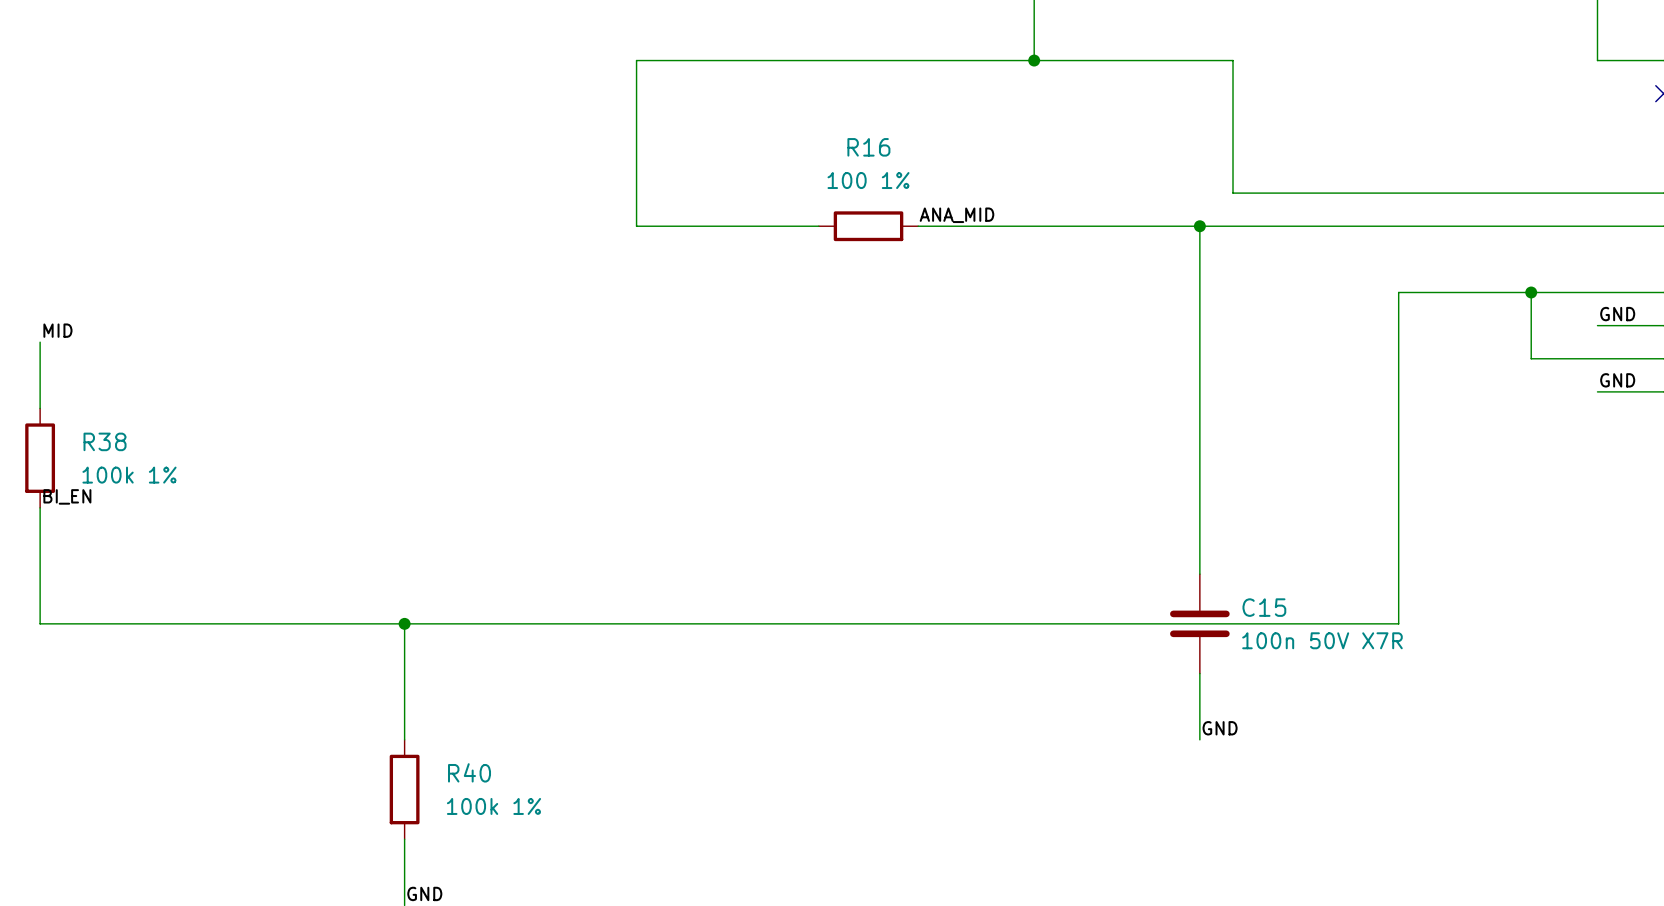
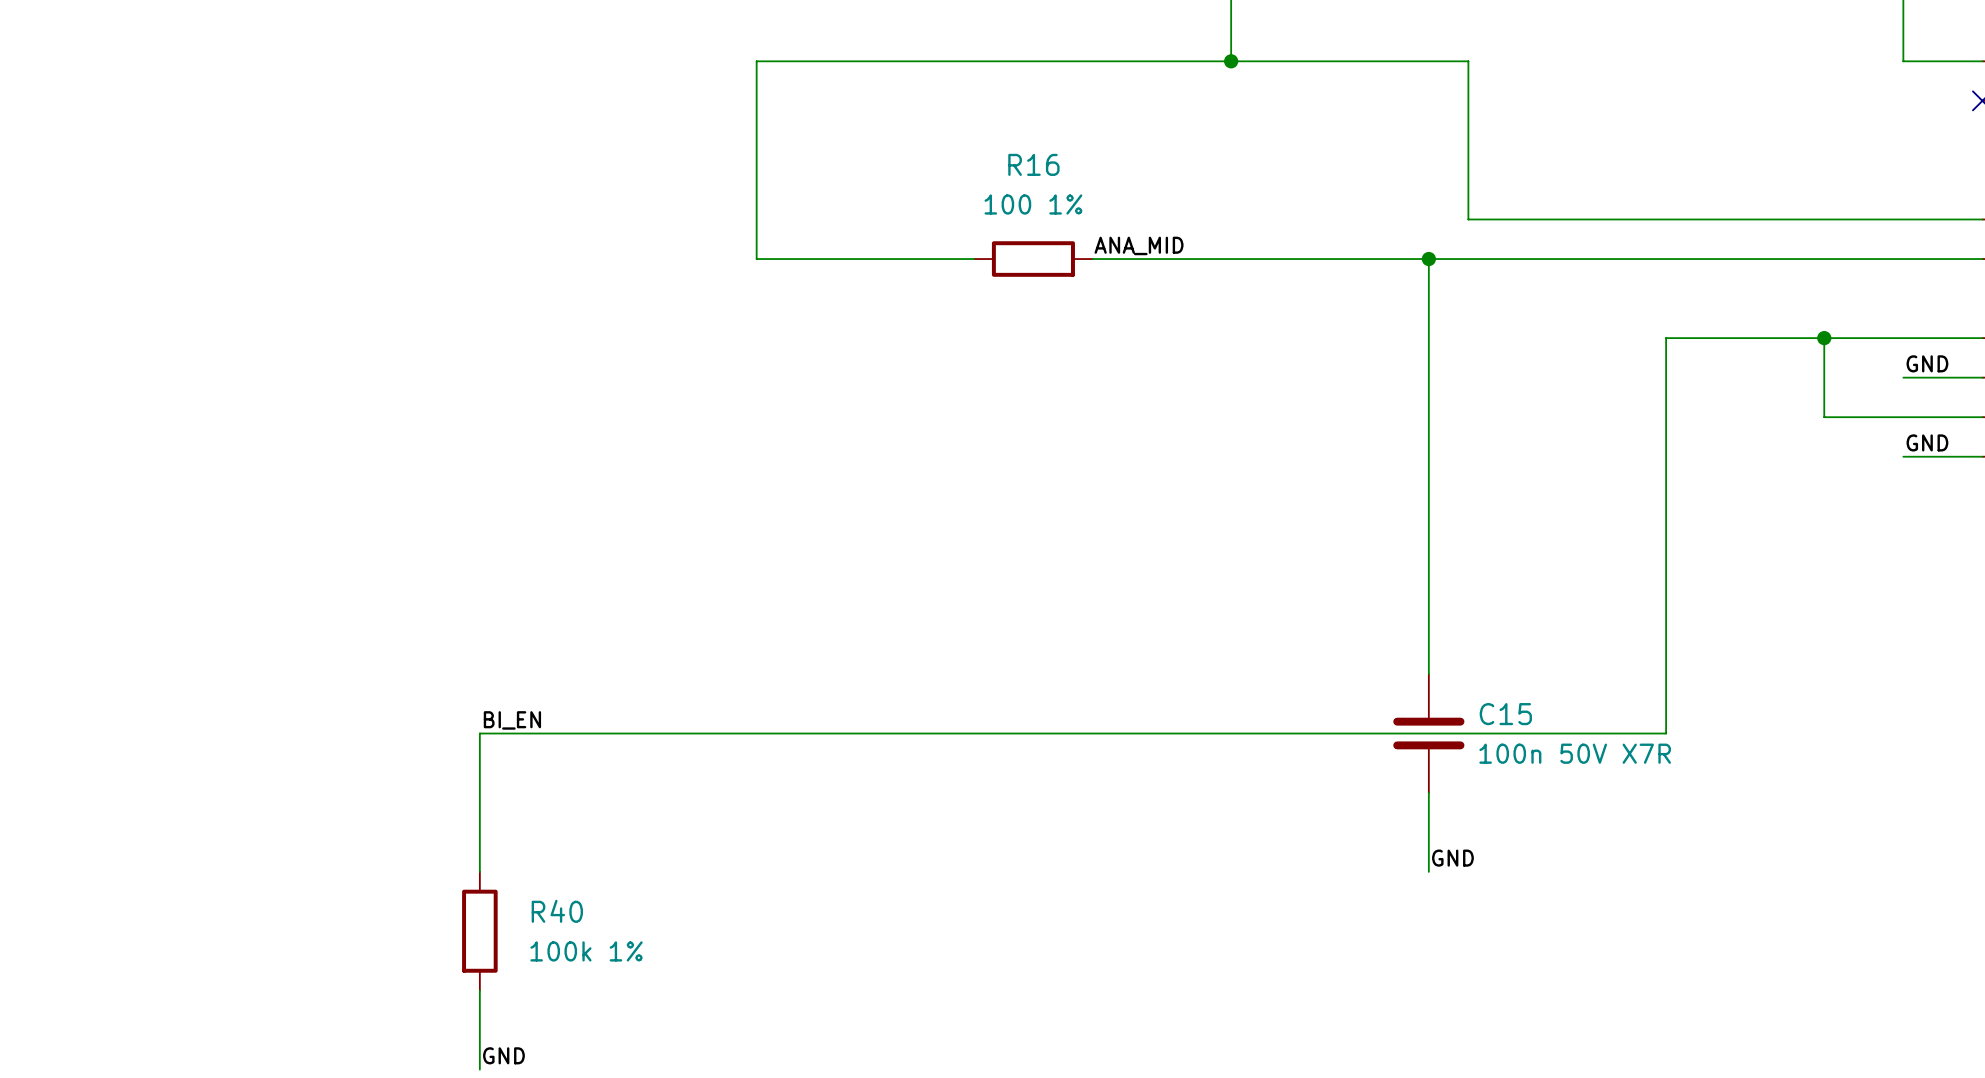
label: MID (57, 330) -> none
wire: (40, 342) (40, 408) -> none
R38: 100k 1% (40, 458) -> none
label: BI_EN (67, 496) -> none
wire: (40, 507) (40, 623) (404, 623) -> none
label: none -> BI_EN (512, 720)
junction: (404, 623) -> none

